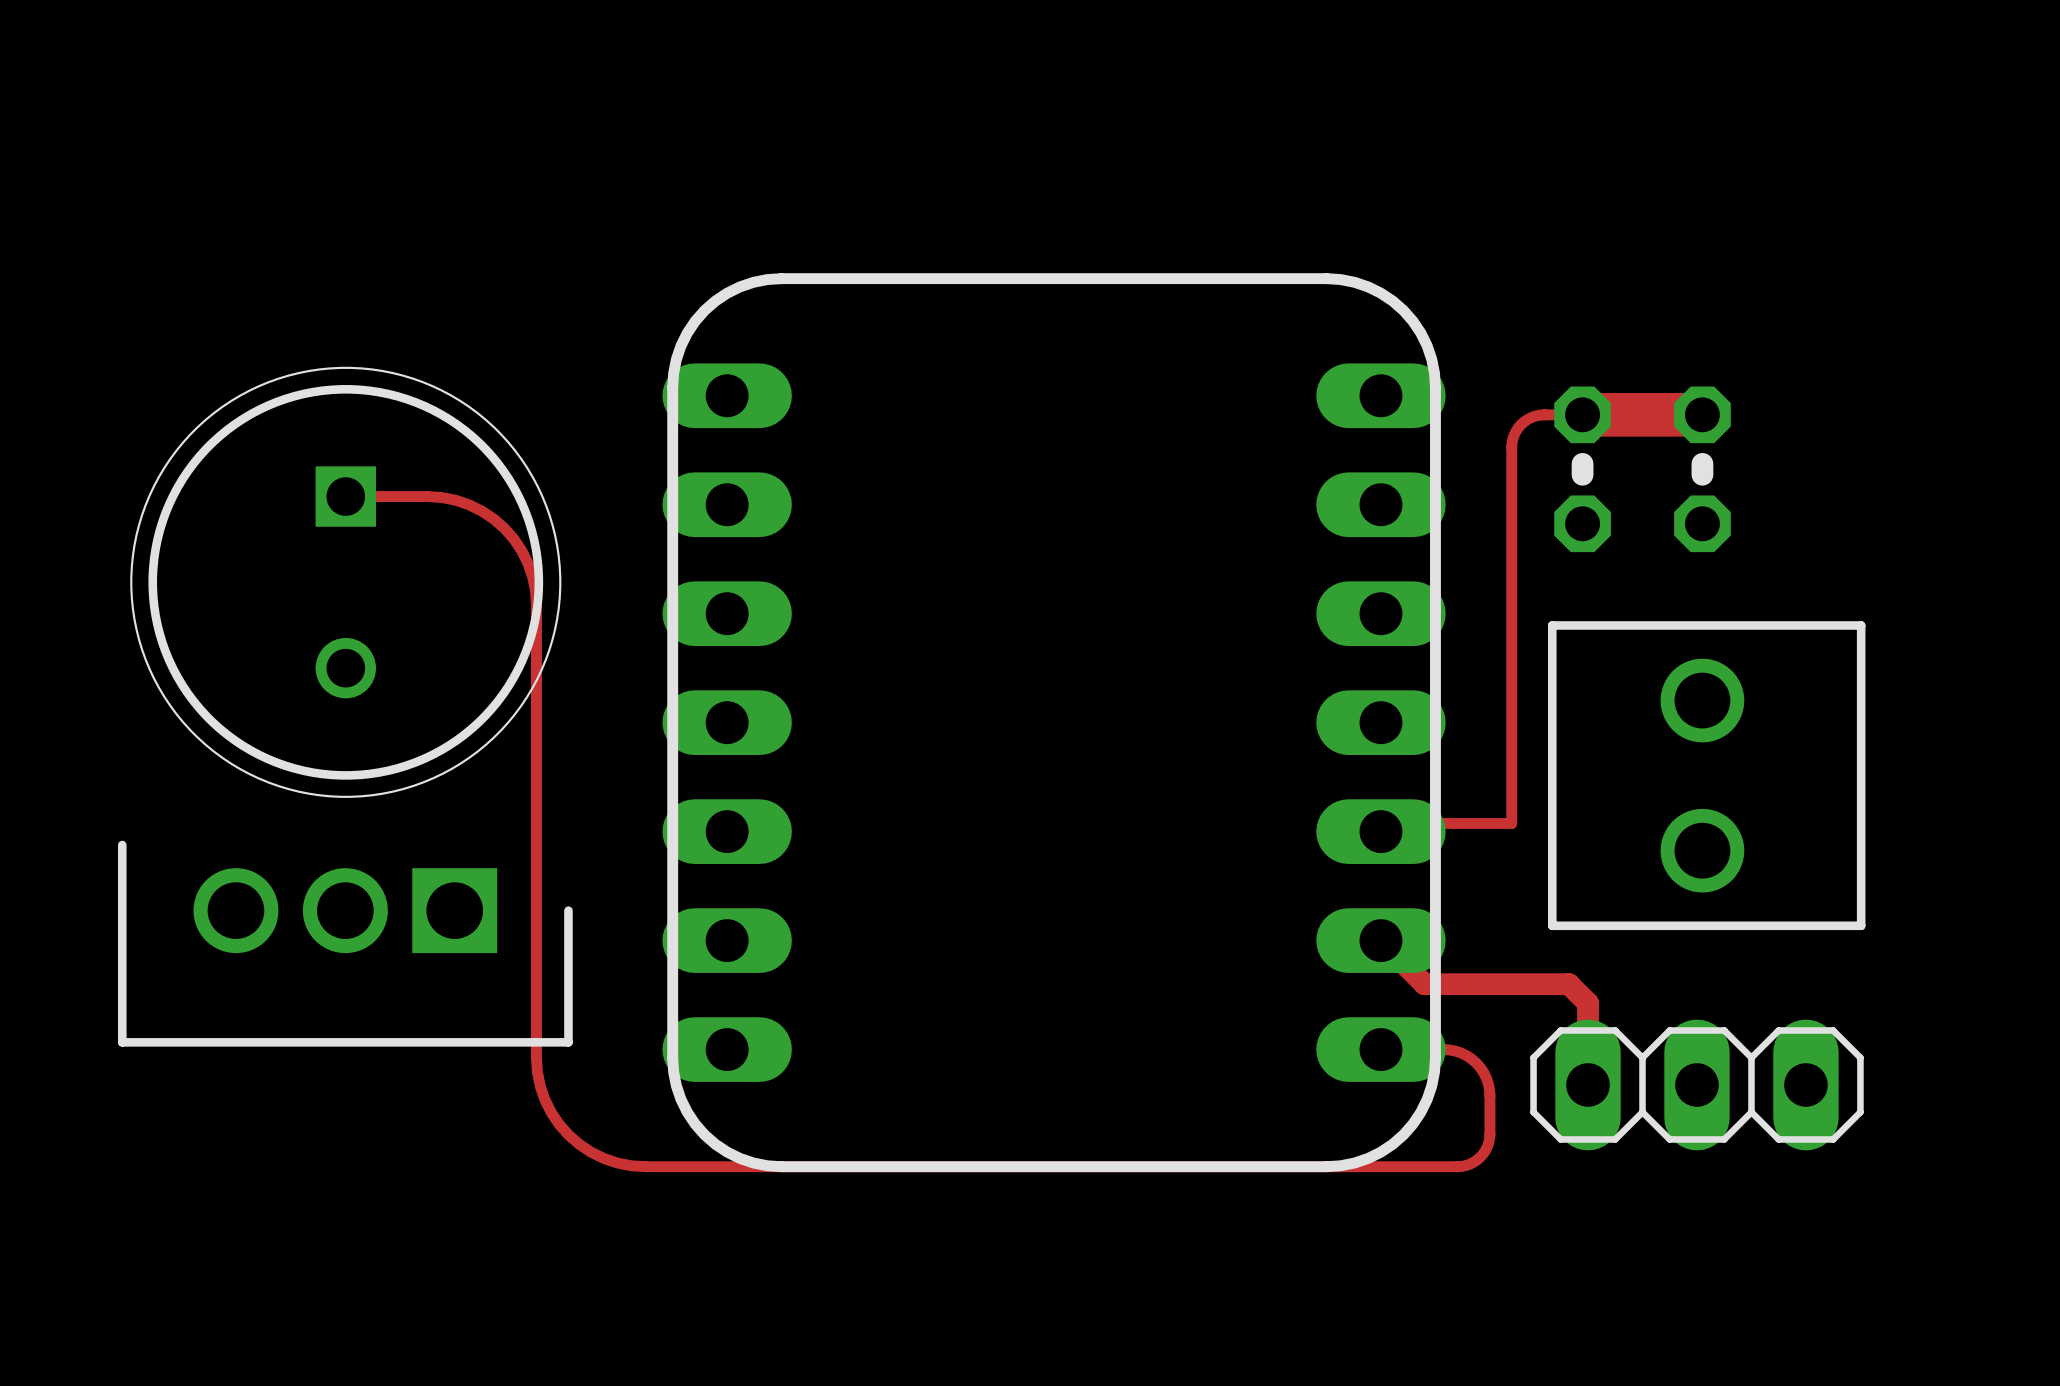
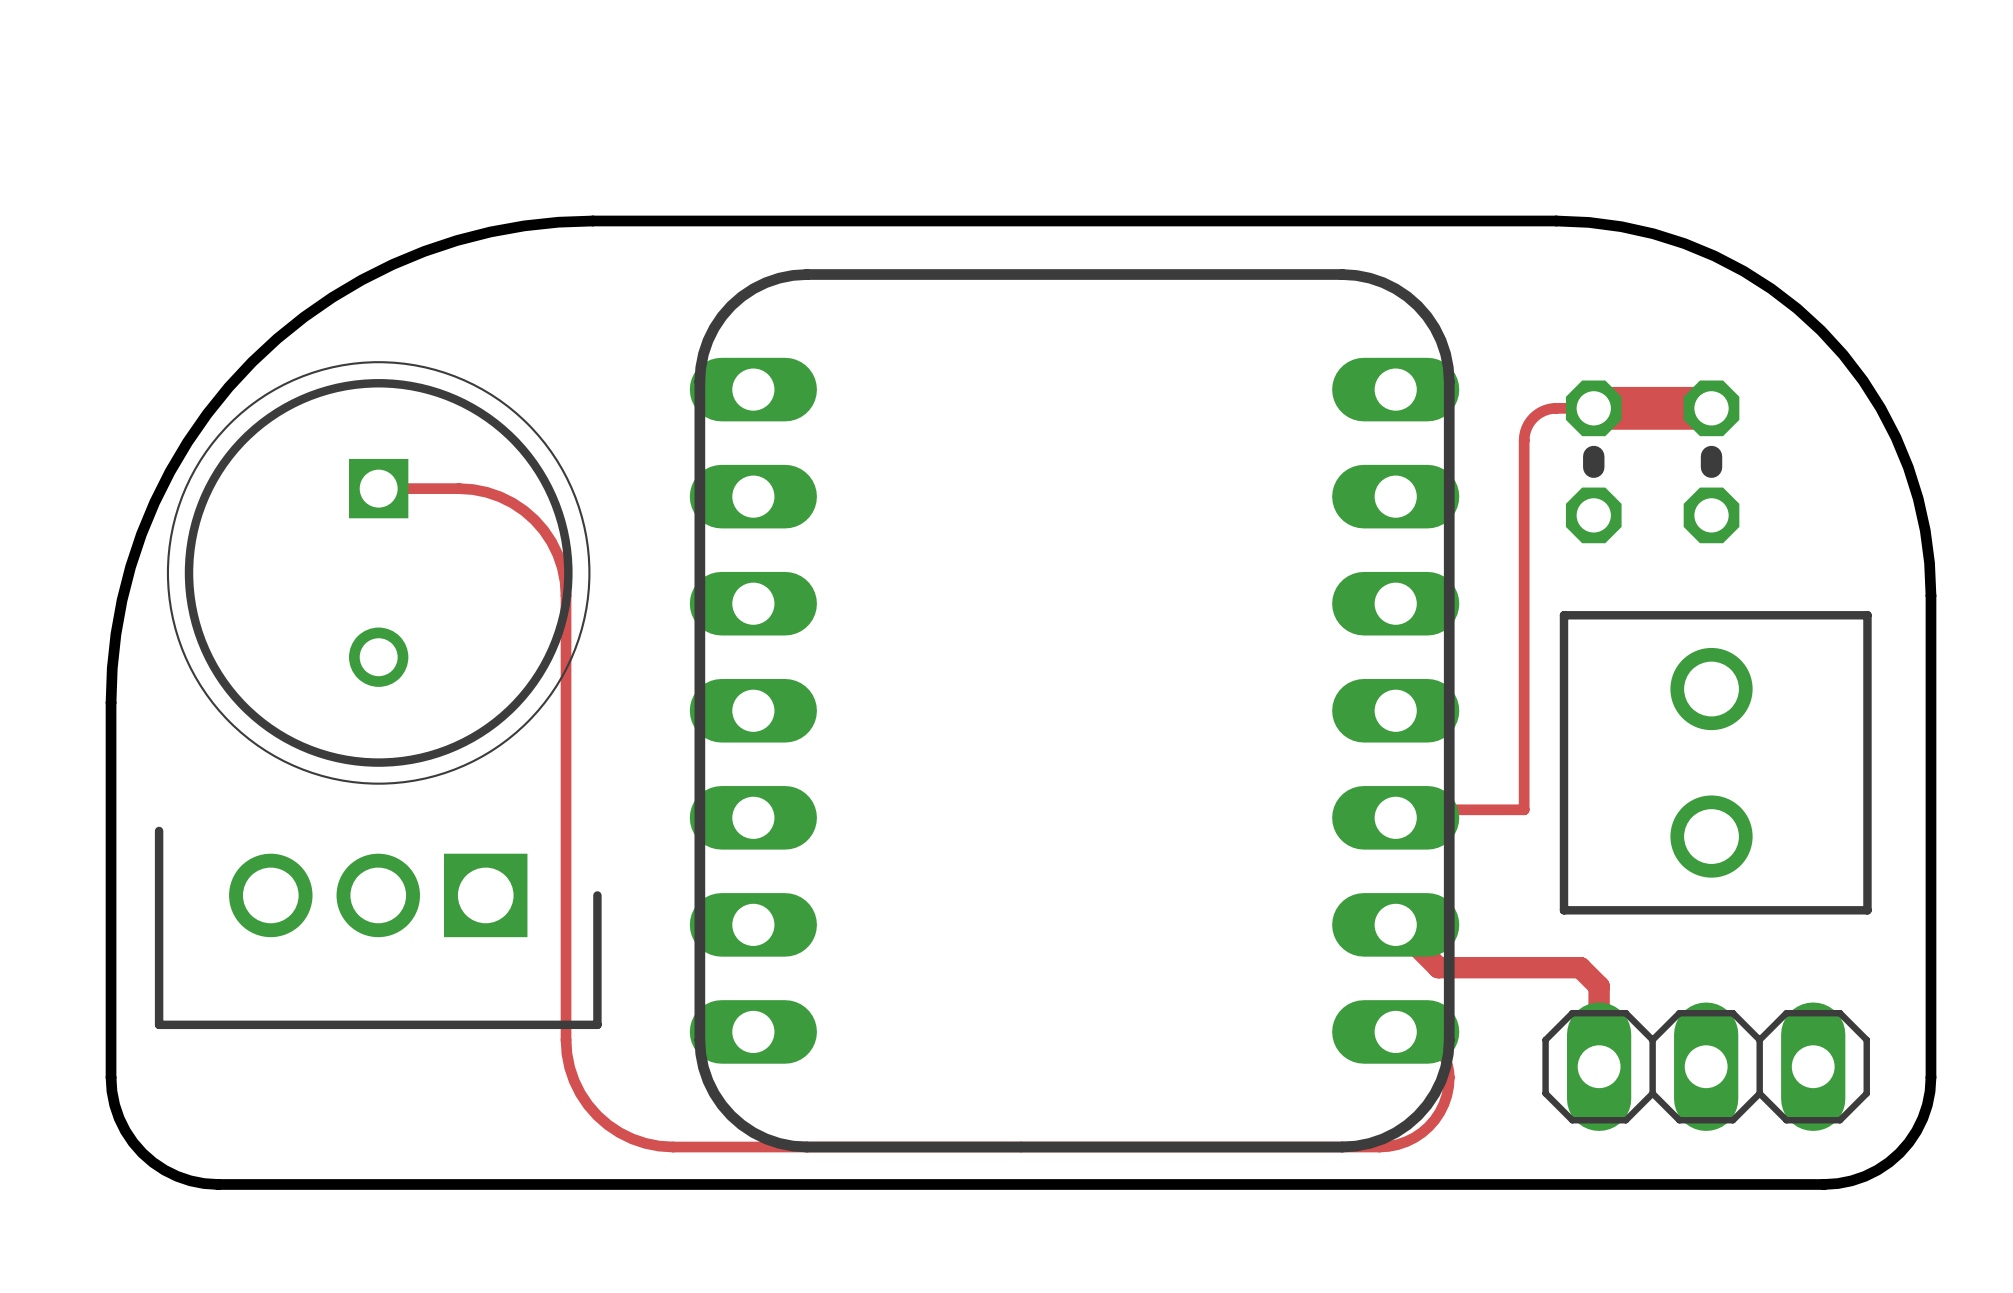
board edge: none -> (592, 220) (1588, 222) (1653, 233) (1684, 243) (1743, 271) (1771, 288) (1821, 330) (1863, 380) (1880, 408) (1908, 467) (1925, 530) (1930, 595) (1930, 1077) (1927, 1105) (1922, 1118) (1908, 1142) (1889, 1162) (1864, 1176) (1851, 1180) (1823, 1184) (218, 1184) (190, 1180) (177, 1176) (152, 1162) (142, 1153) (125, 1130) (114, 1105) (111, 1091) (111, 702) (115, 634) (122, 600) (130, 567) (154, 502) (187, 442) (228, 387) (277, 338) (332, 297) (392, 264) (457, 240) (524, 225) (592, 220)
track: (1380, 1049) (1449, 1049) (1461, 1053) (1471, 1059) (1483, 1072) (1488, 1083) (1489, 1138) (1483, 1153) (1473, 1162) (1465, 1165) (1364, 1166) -> (1403, 1031) (1421, 1035) (1431, 1041) (1439, 1049) (1445, 1060) (1448, 1071) (1446, 1095) (1434, 1119) (1422, 1132) (1397, 1144) (1379, 1147)

